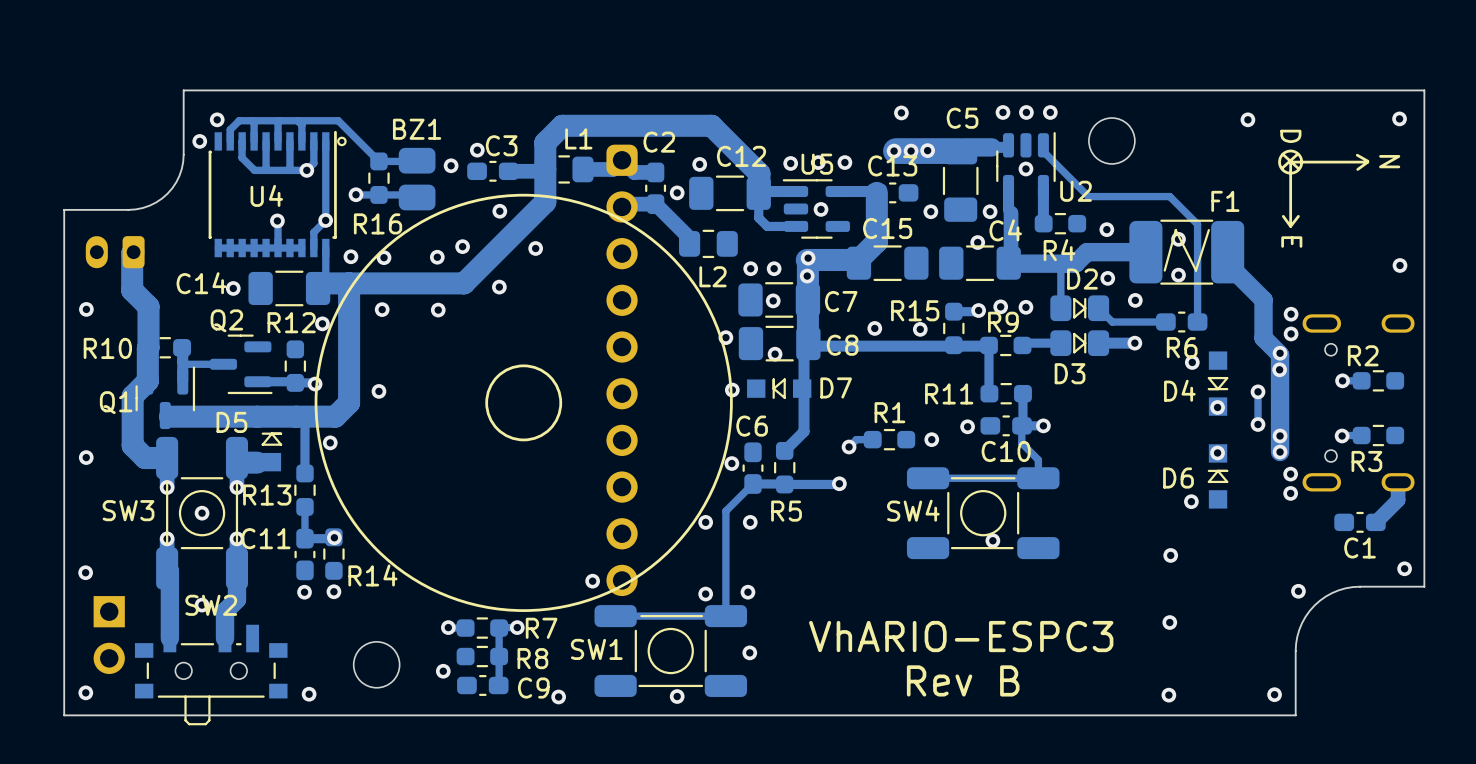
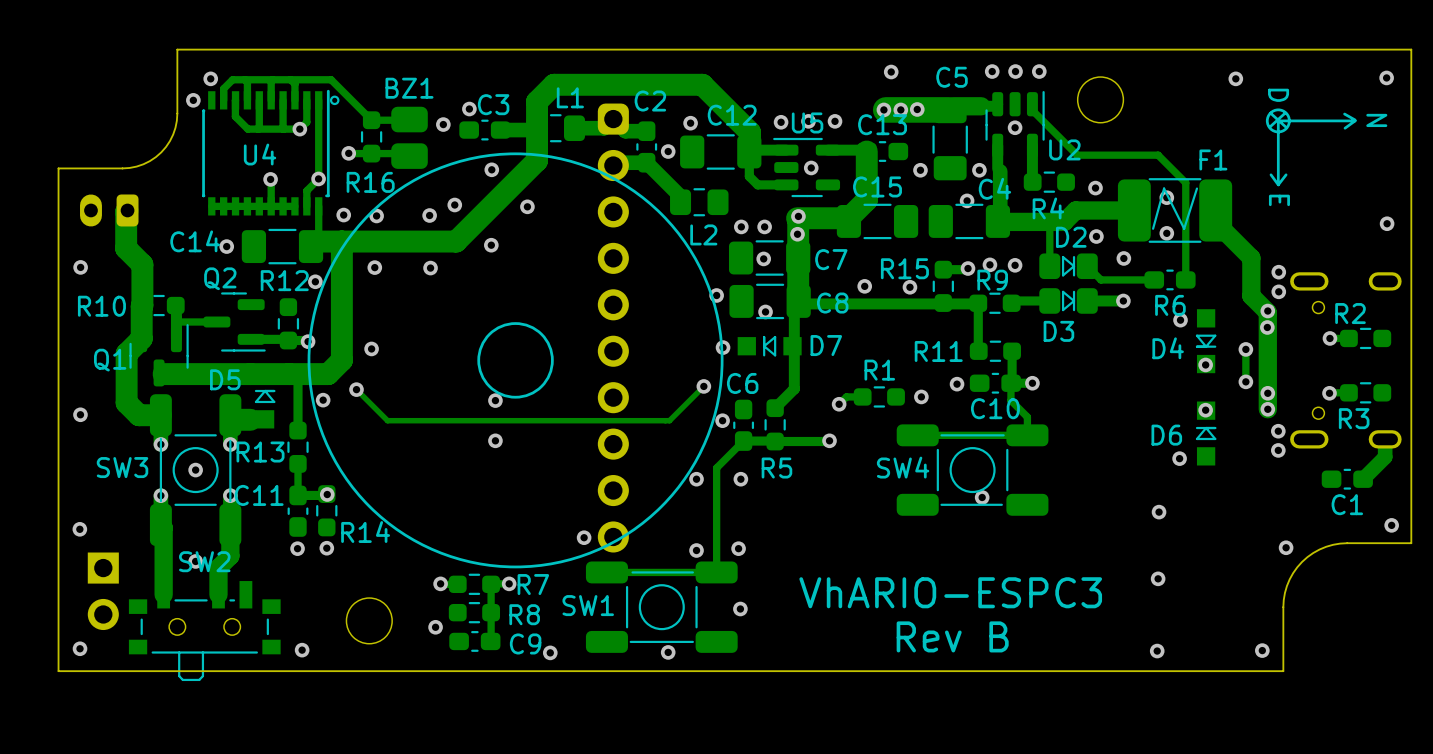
track: none -> (703, 386) (669, 420) (387, 420) (356, 389)
via: none -> (703, 386)
via: none -> (356, 389)
via: none -> (495, 400)
via: none -> (495, 440)

